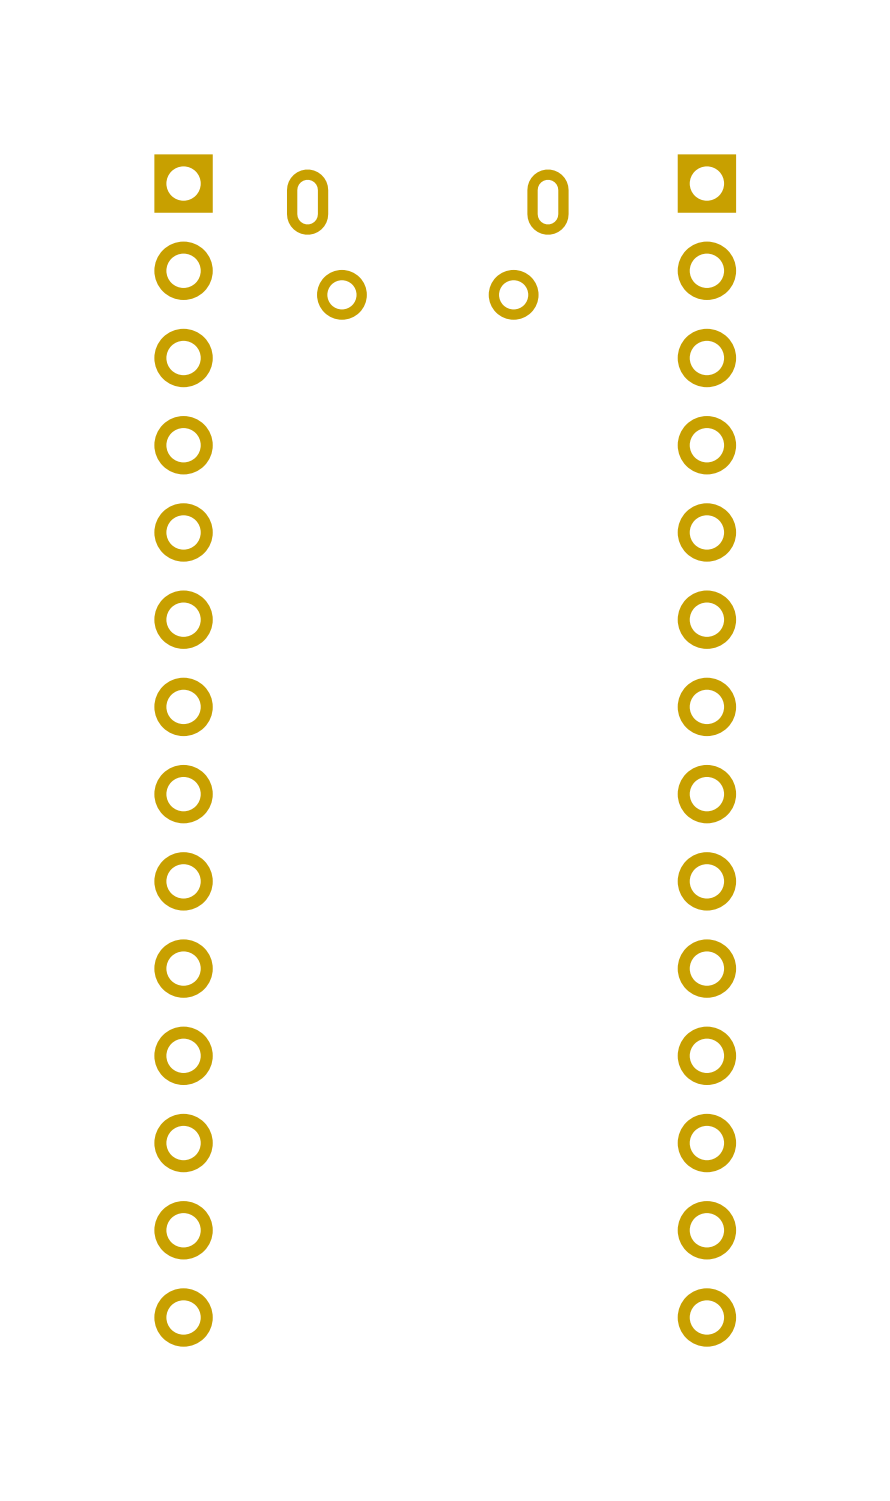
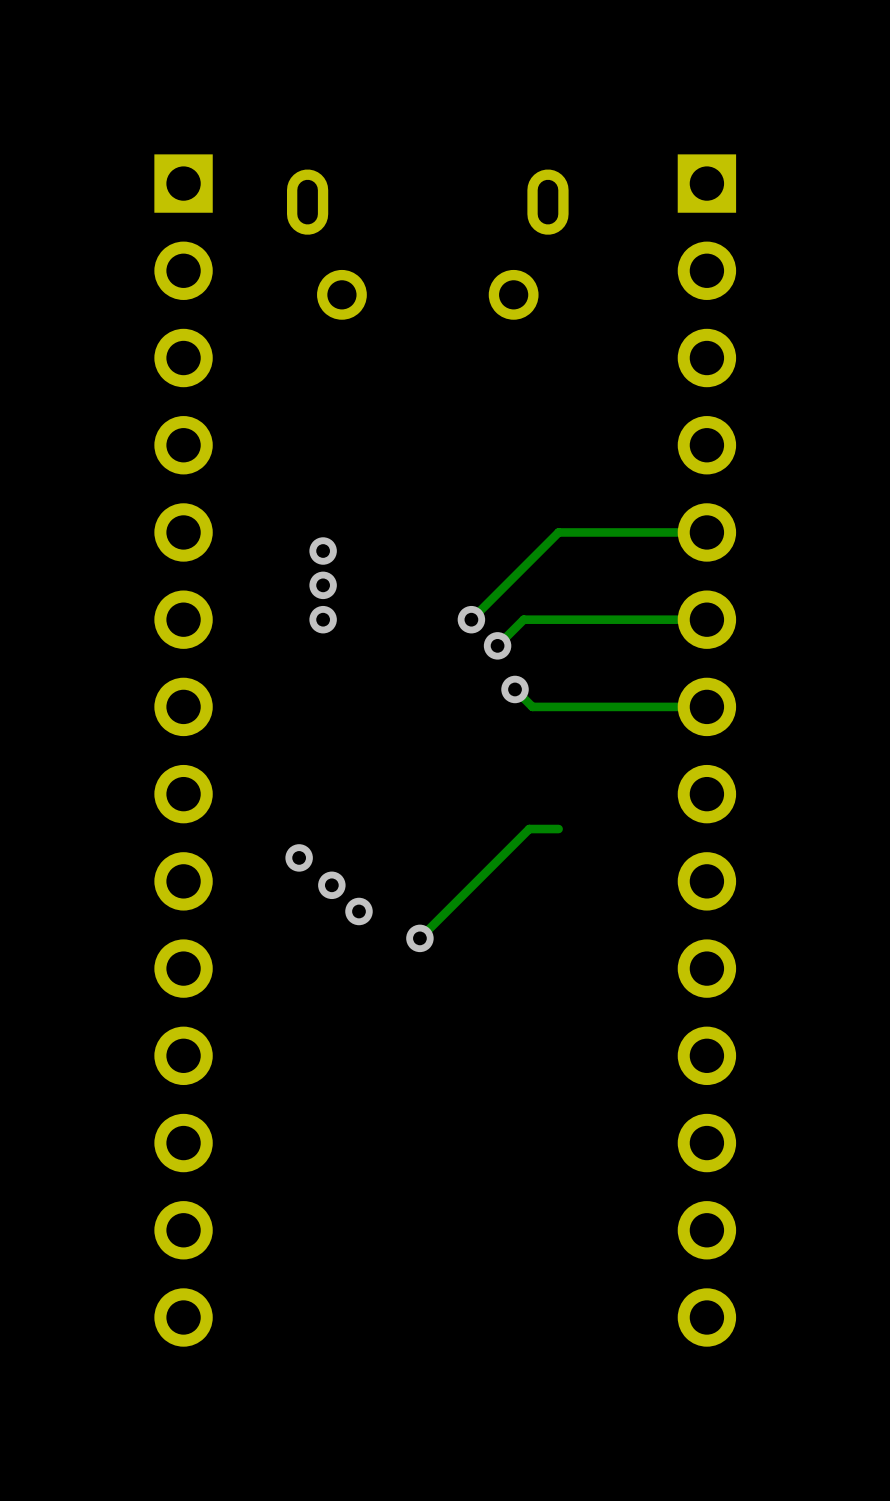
track: none -> (706, 532) (558, 532) (471, 619)
via: none -> (323, 551)
via: none -> (323, 585)
via: none -> (323, 619)
via: none -> (471, 619)
track: none -> (706, 619) (523, 619) (497, 645)
via: none -> (497, 645)
track: none -> (515, 689) (532, 706) (706, 706)
via: none -> (515, 689)
track: none -> (558, 829) (529, 829) (419, 938)
via: none -> (299, 857)
via: none -> (331, 885)
via: none -> (358, 911)
via: none -> (419, 938)

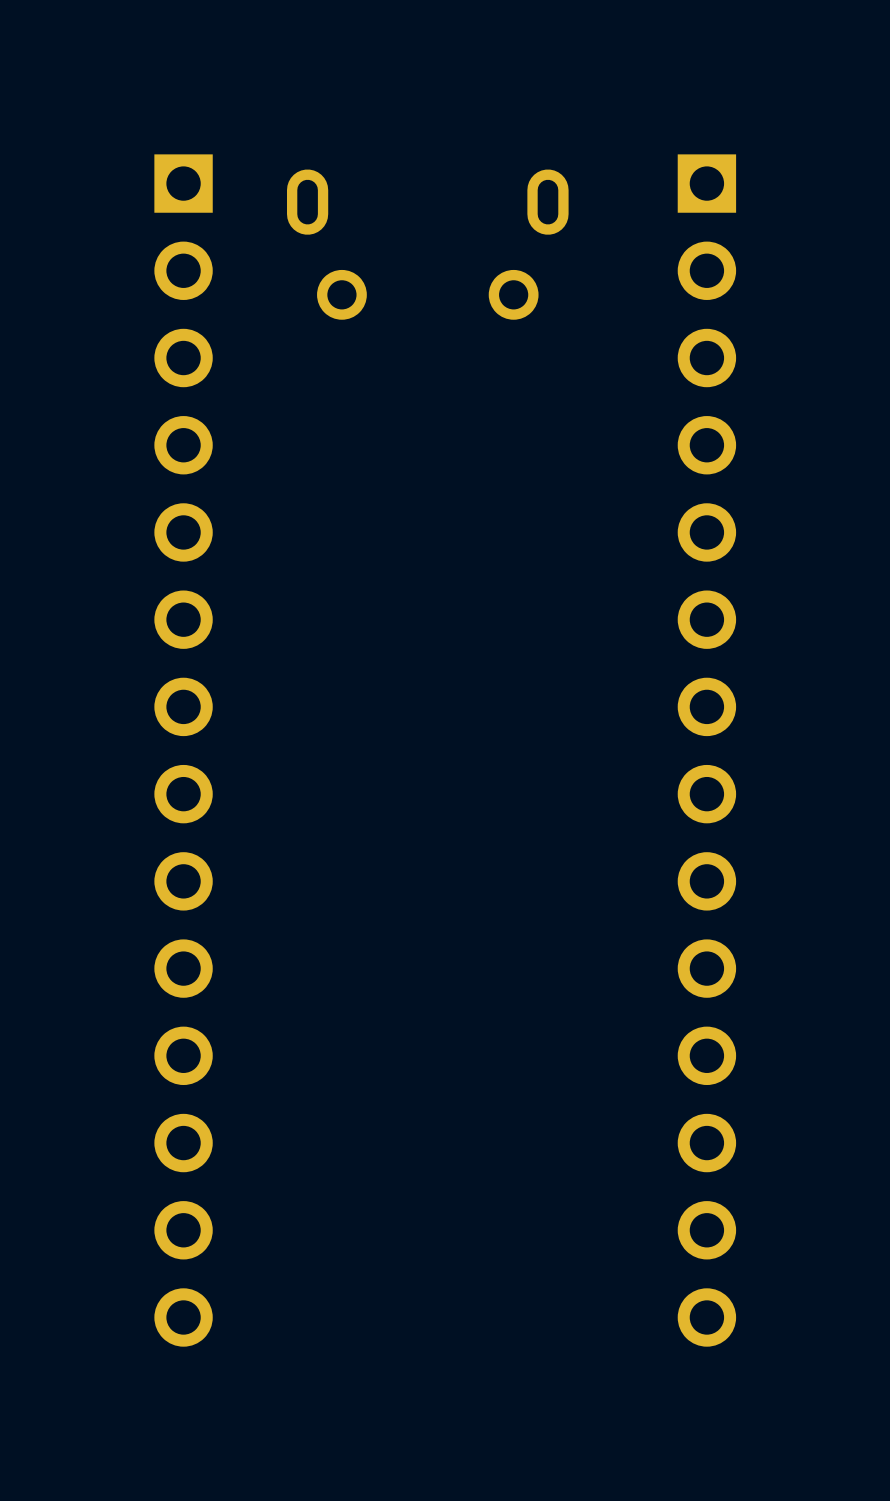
track: (706, 532) (558, 532) (471, 619) -> none
via: (323, 551) -> none
via: (323, 585) -> none
via: (323, 619) -> none
via: (471, 619) -> none
track: (706, 619) (523, 619) (497, 645) -> none
via: (497, 645) -> none
track: (515, 689) (532, 706) (706, 706) -> none
via: (515, 689) -> none
track: (558, 829) (529, 829) (419, 938) -> none
via: (299, 857) -> none
via: (331, 885) -> none
via: (358, 911) -> none
via: (419, 938) -> none

